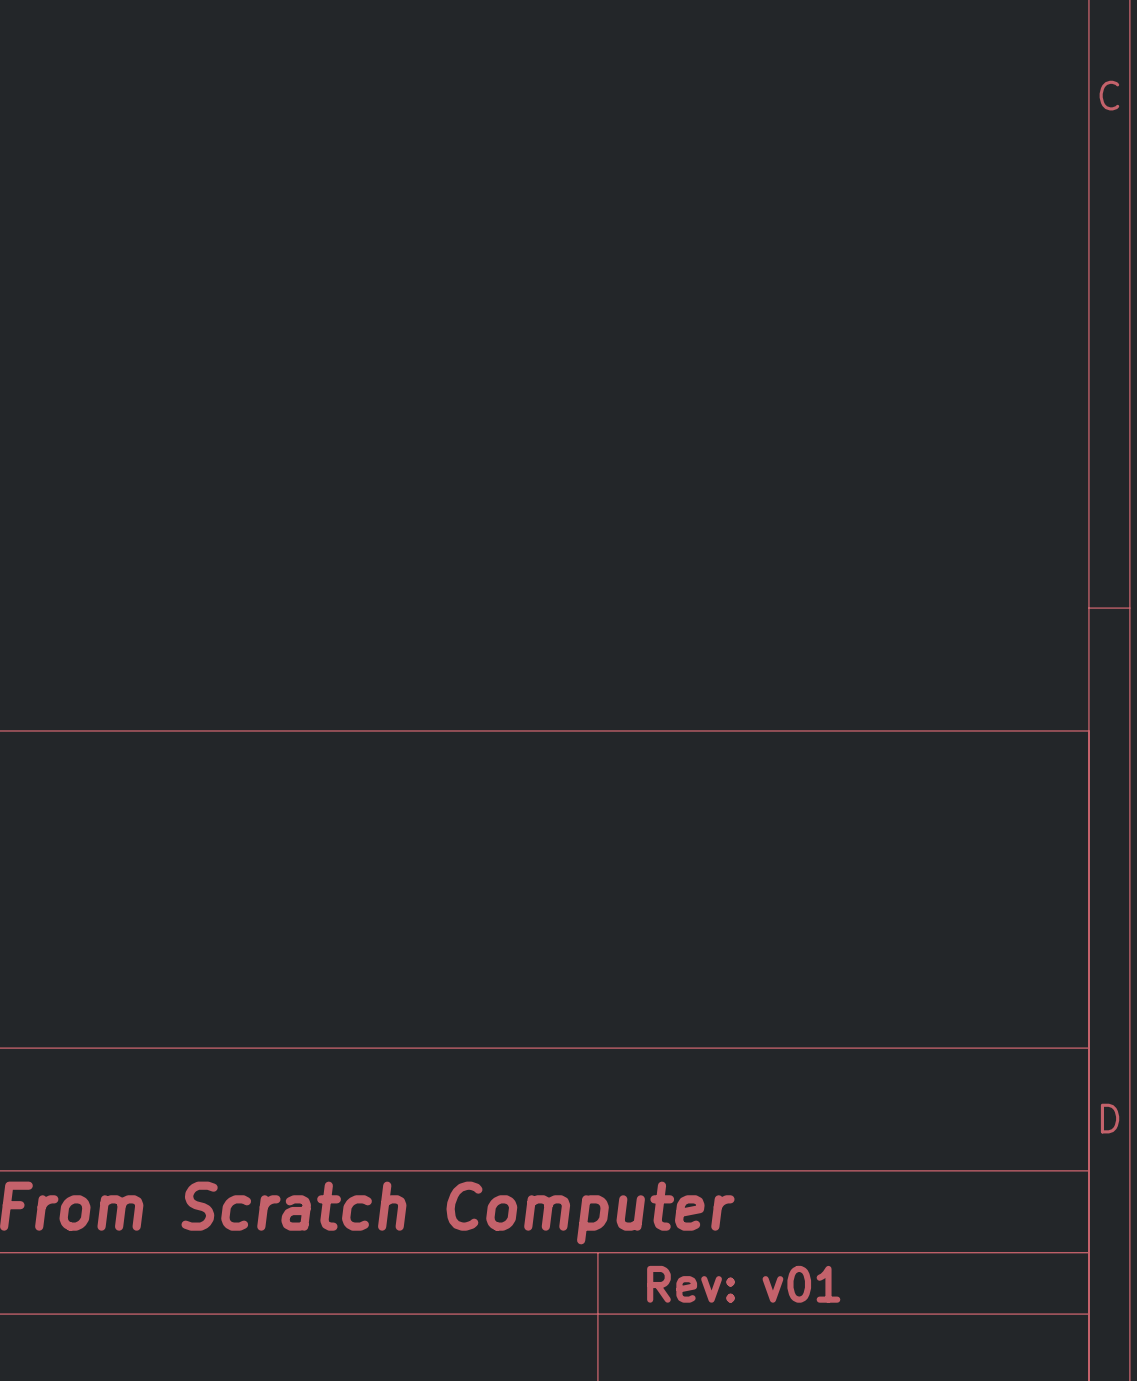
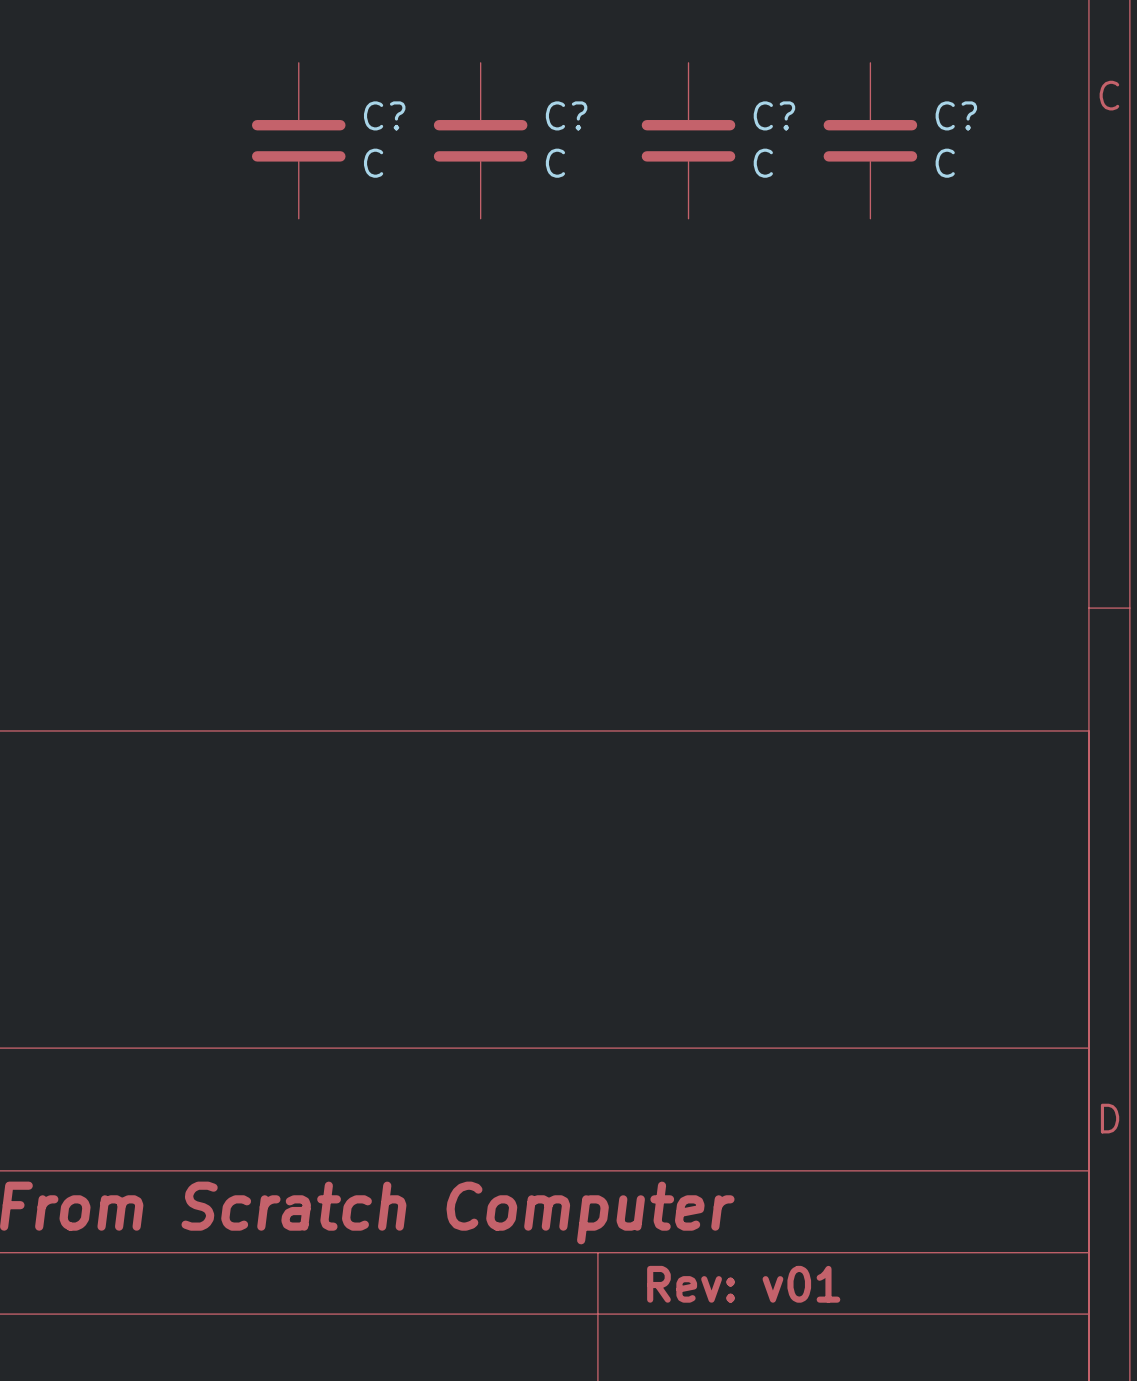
C?: none -> C (298, 140)
C?: none -> C (480, 140)
C?: none -> C (688, 140)
C?: none -> C (870, 140)

